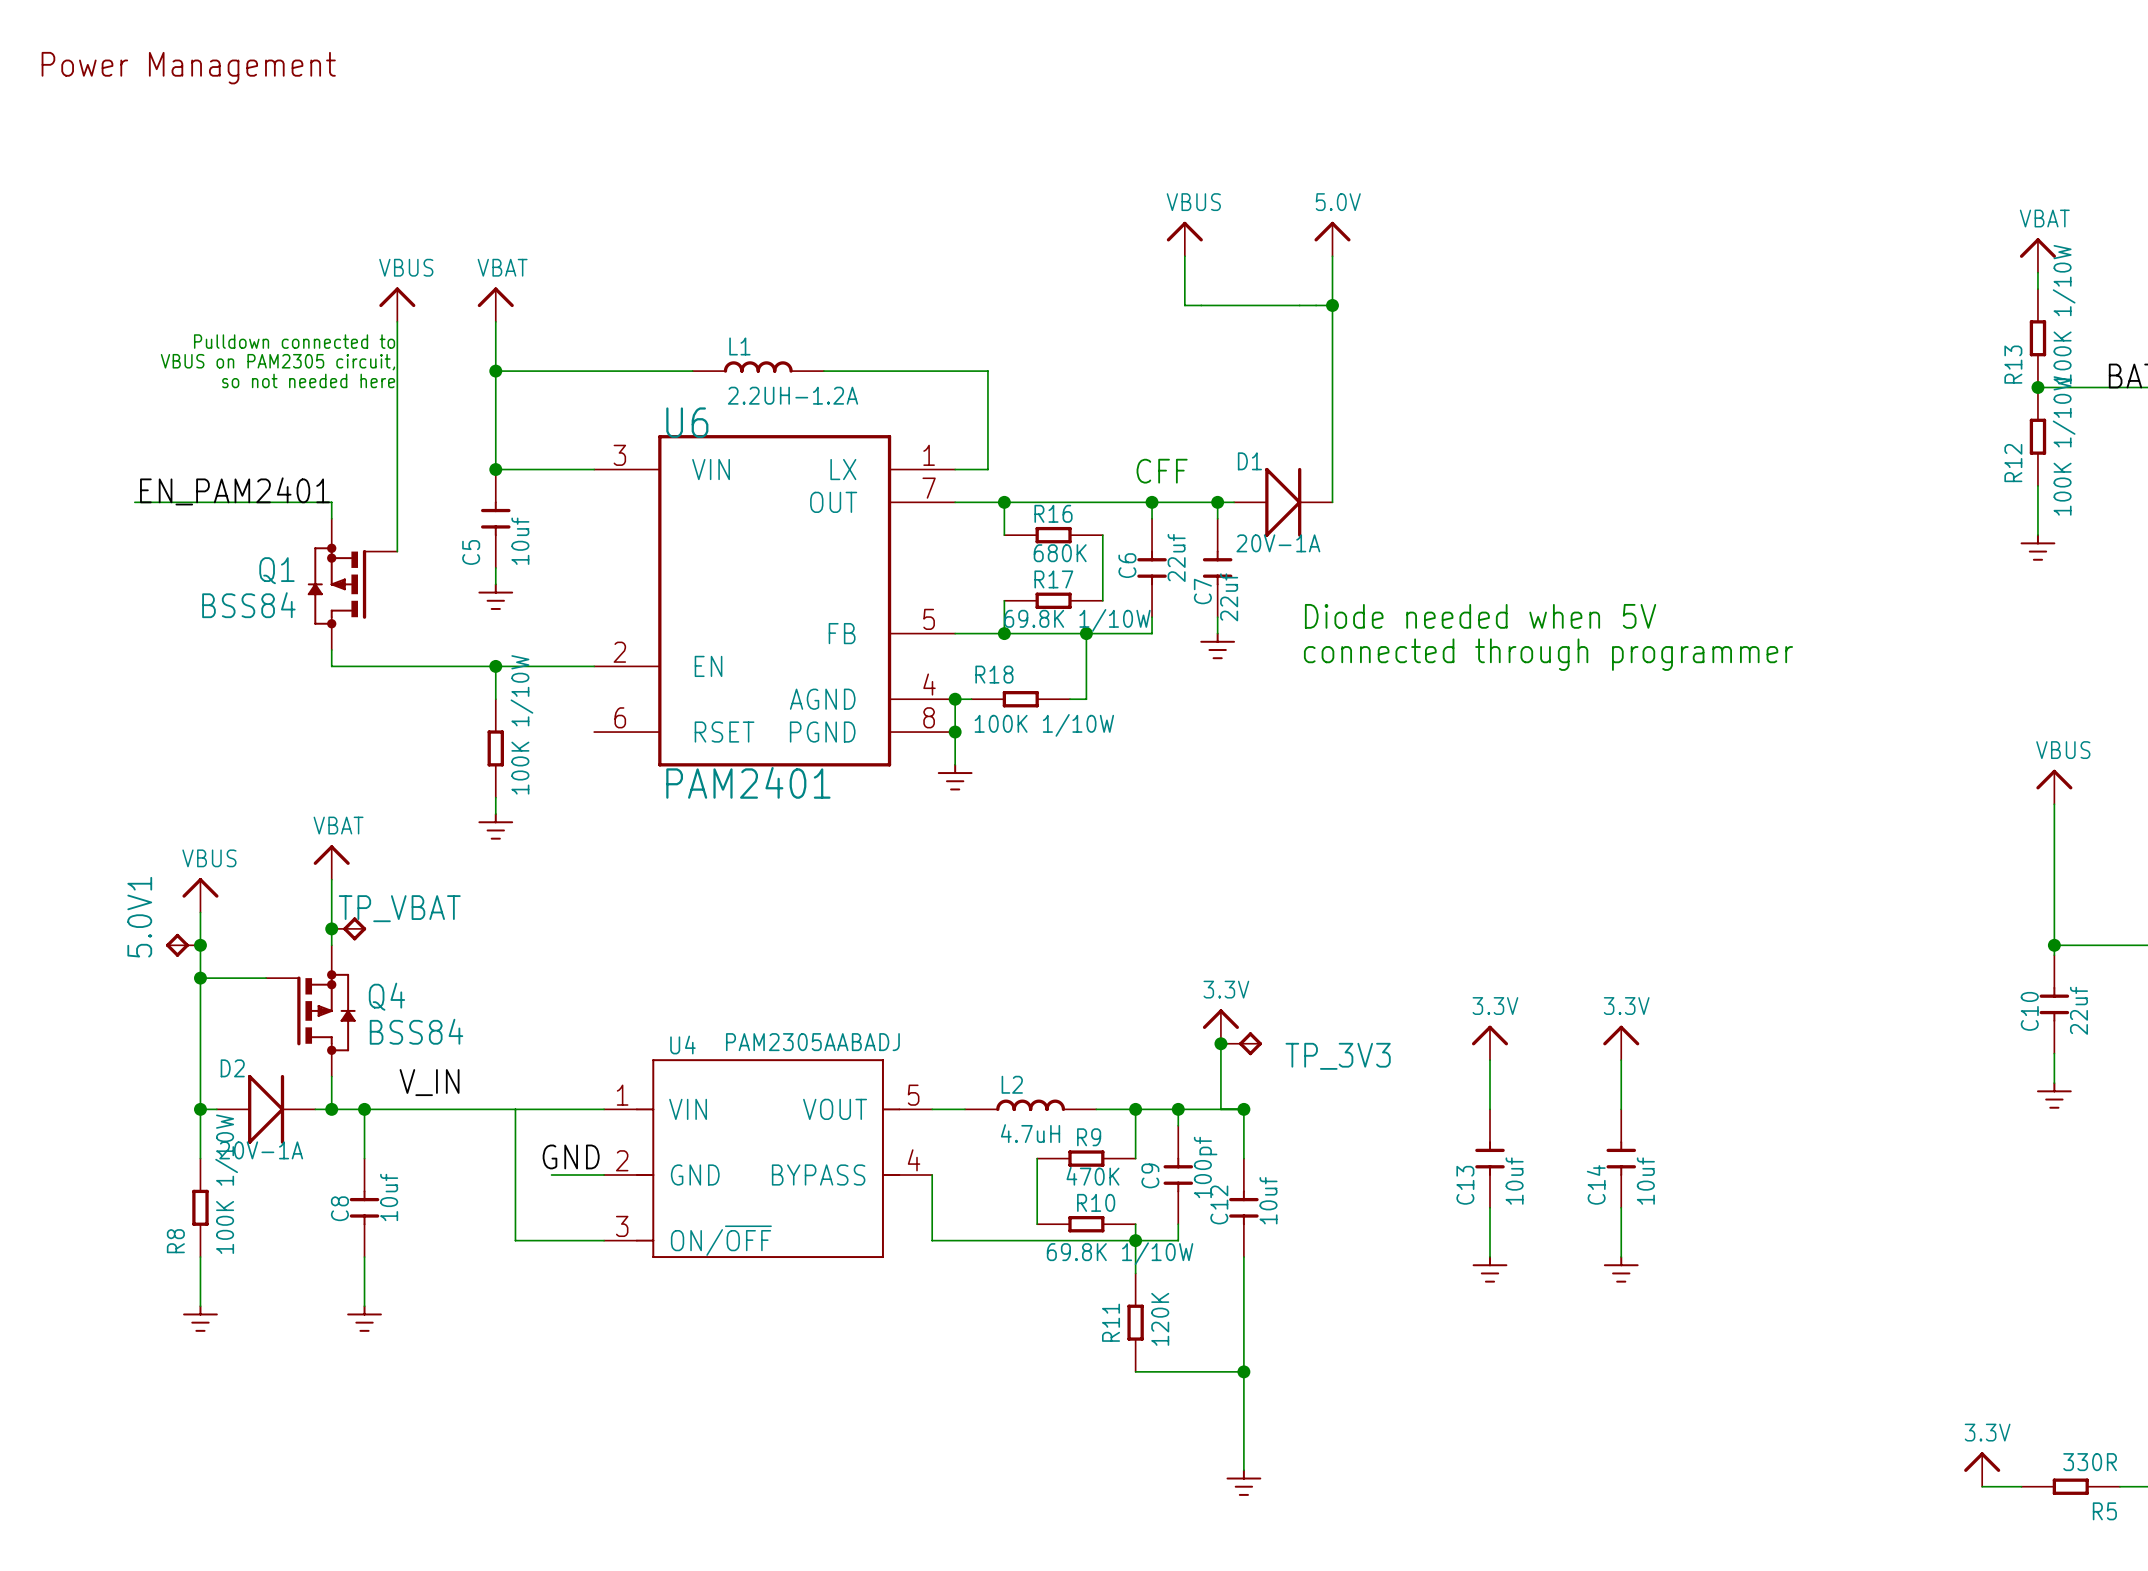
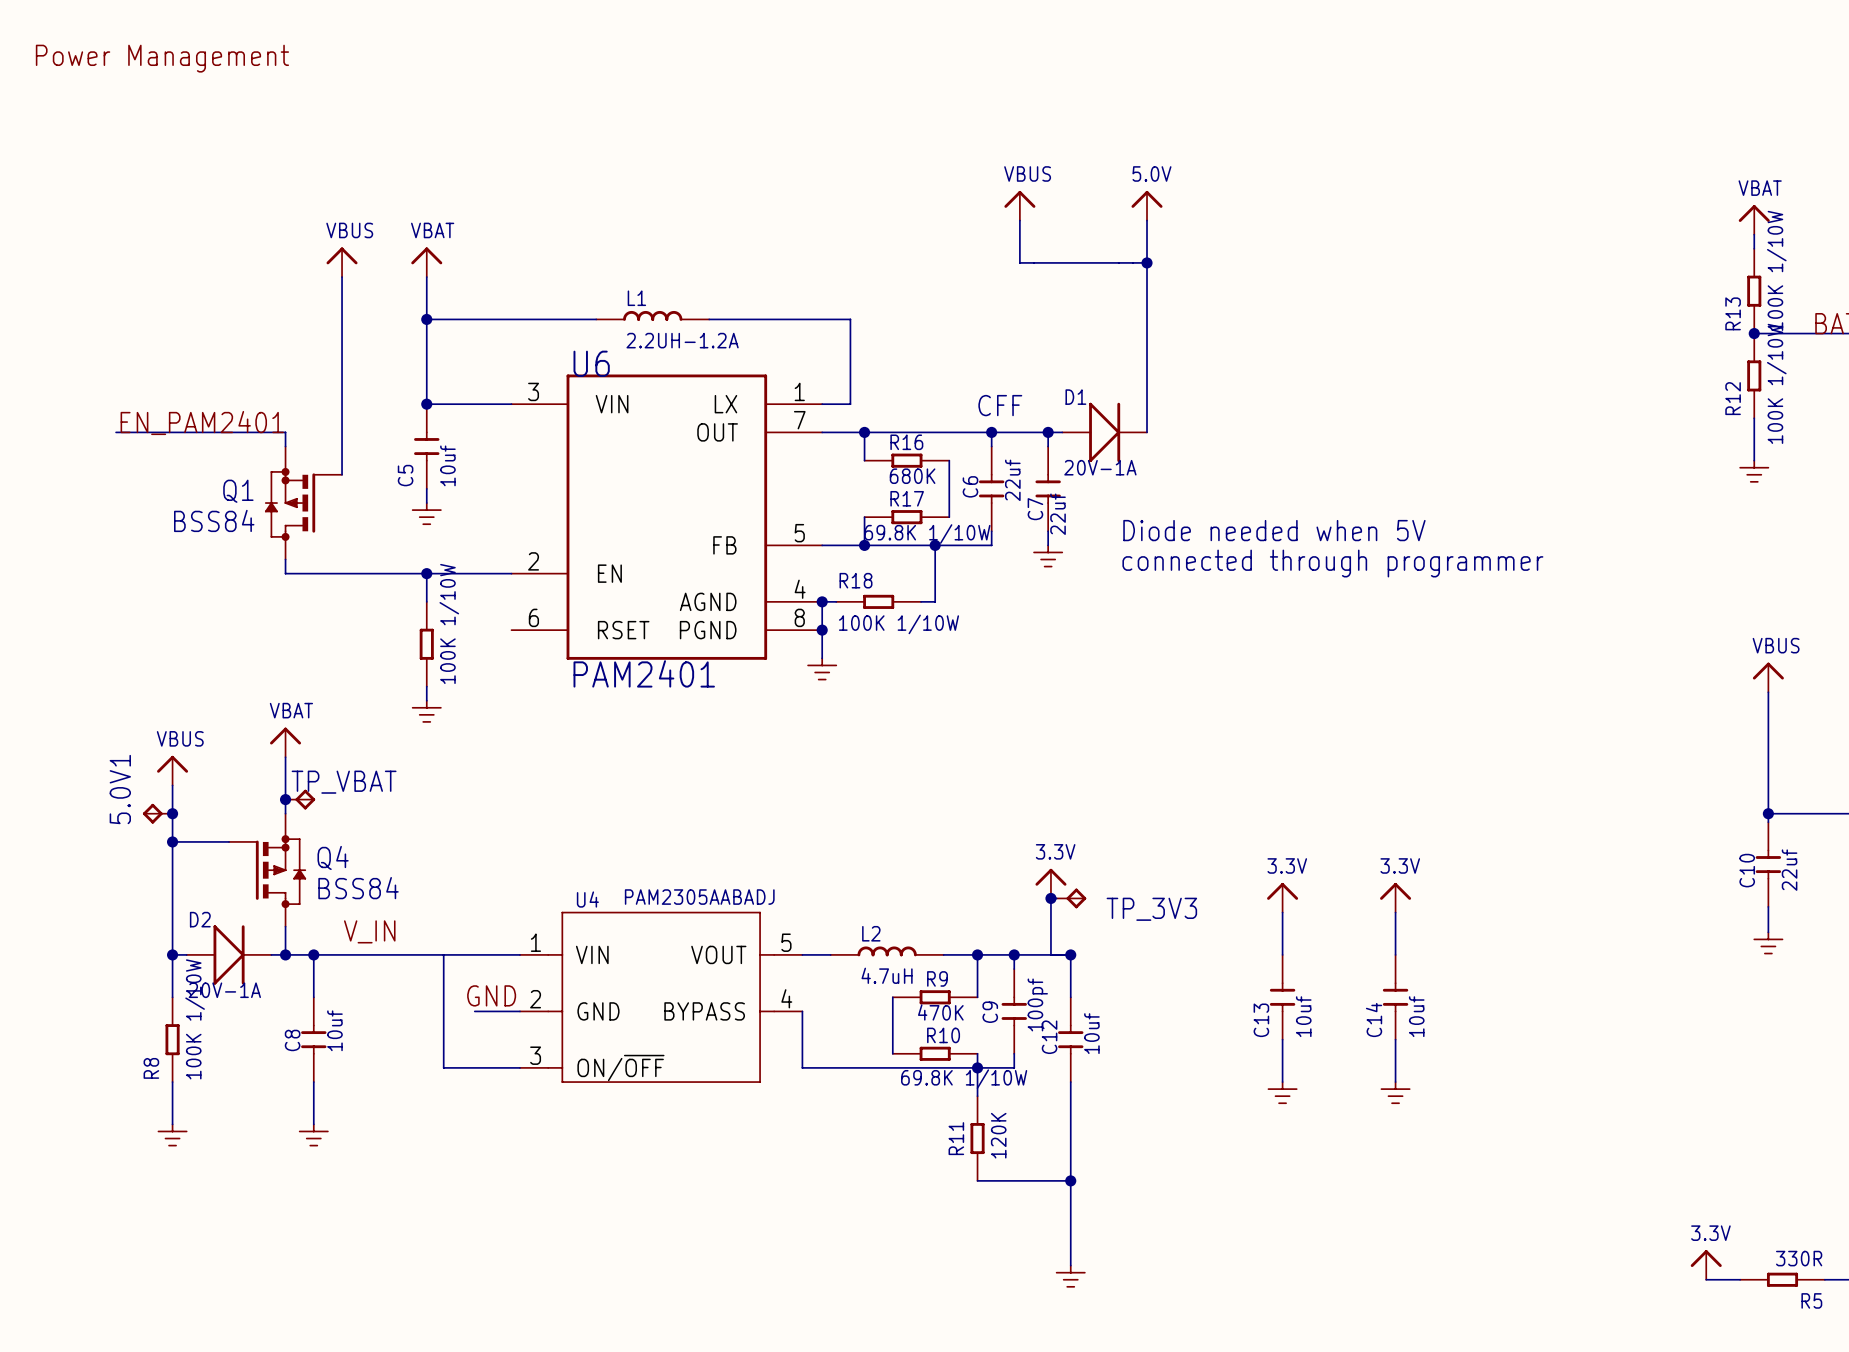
text: Pulldown connected to (294, 341) -> none
text: VBUS on PAM2305 circuit, (277, 362) -> none
text: so not needed here (308, 380) -> none

